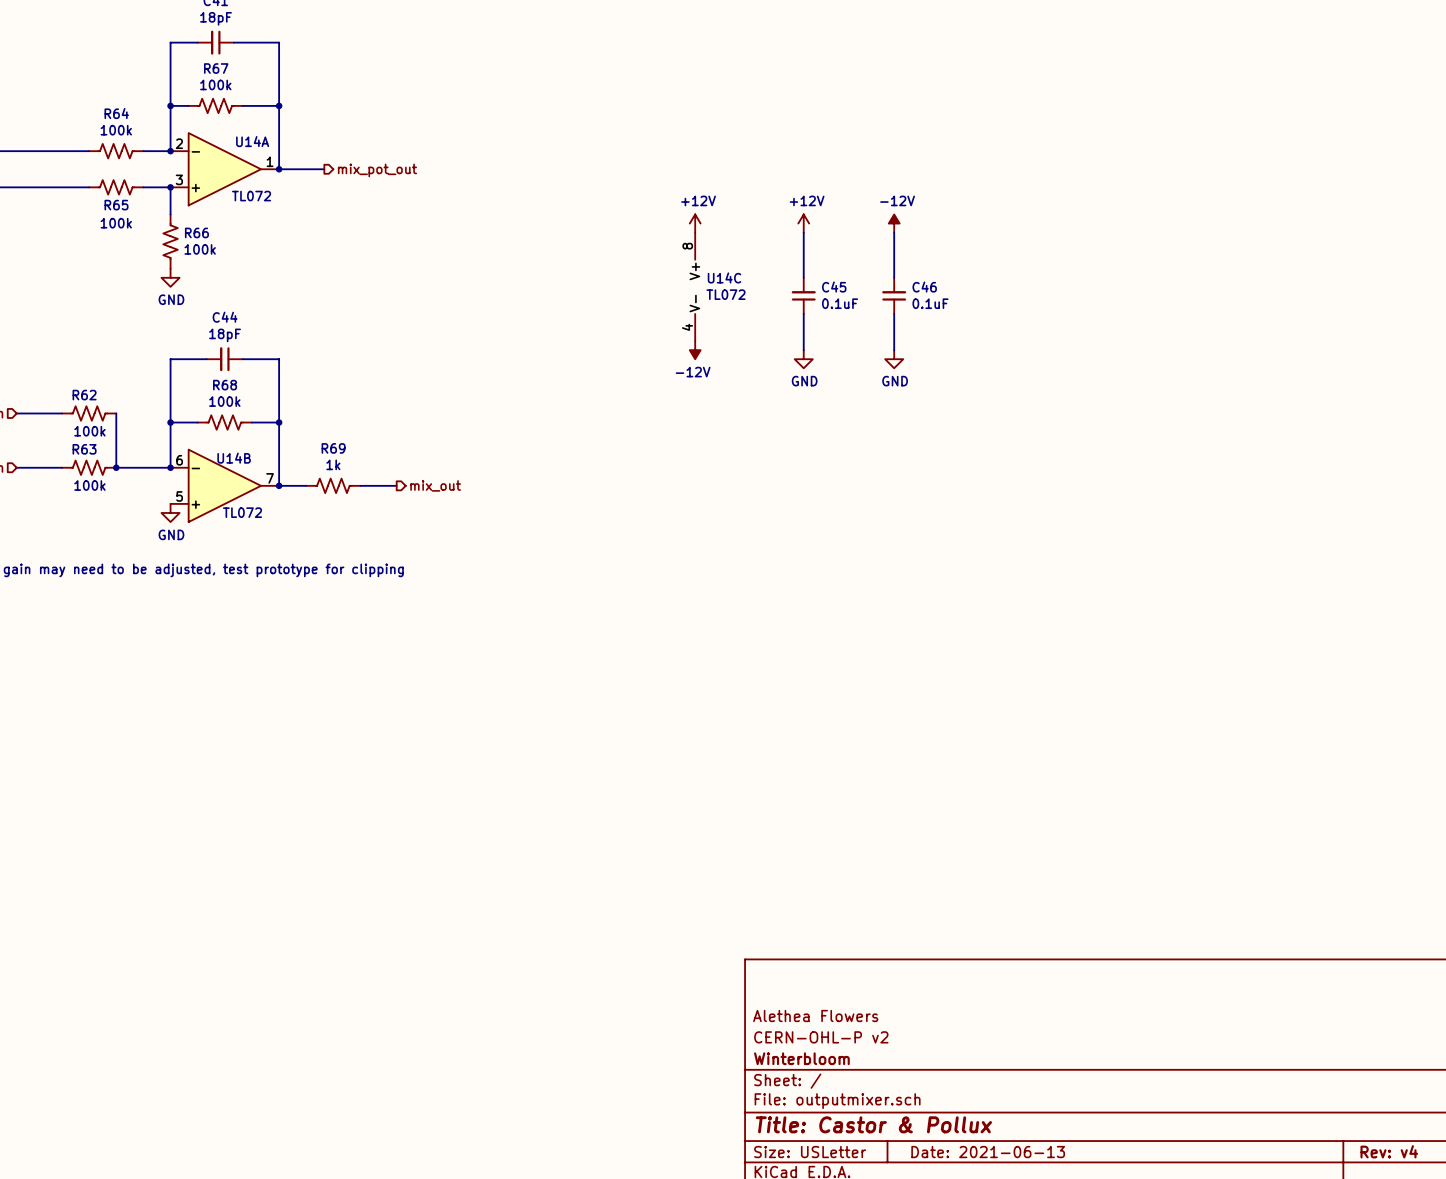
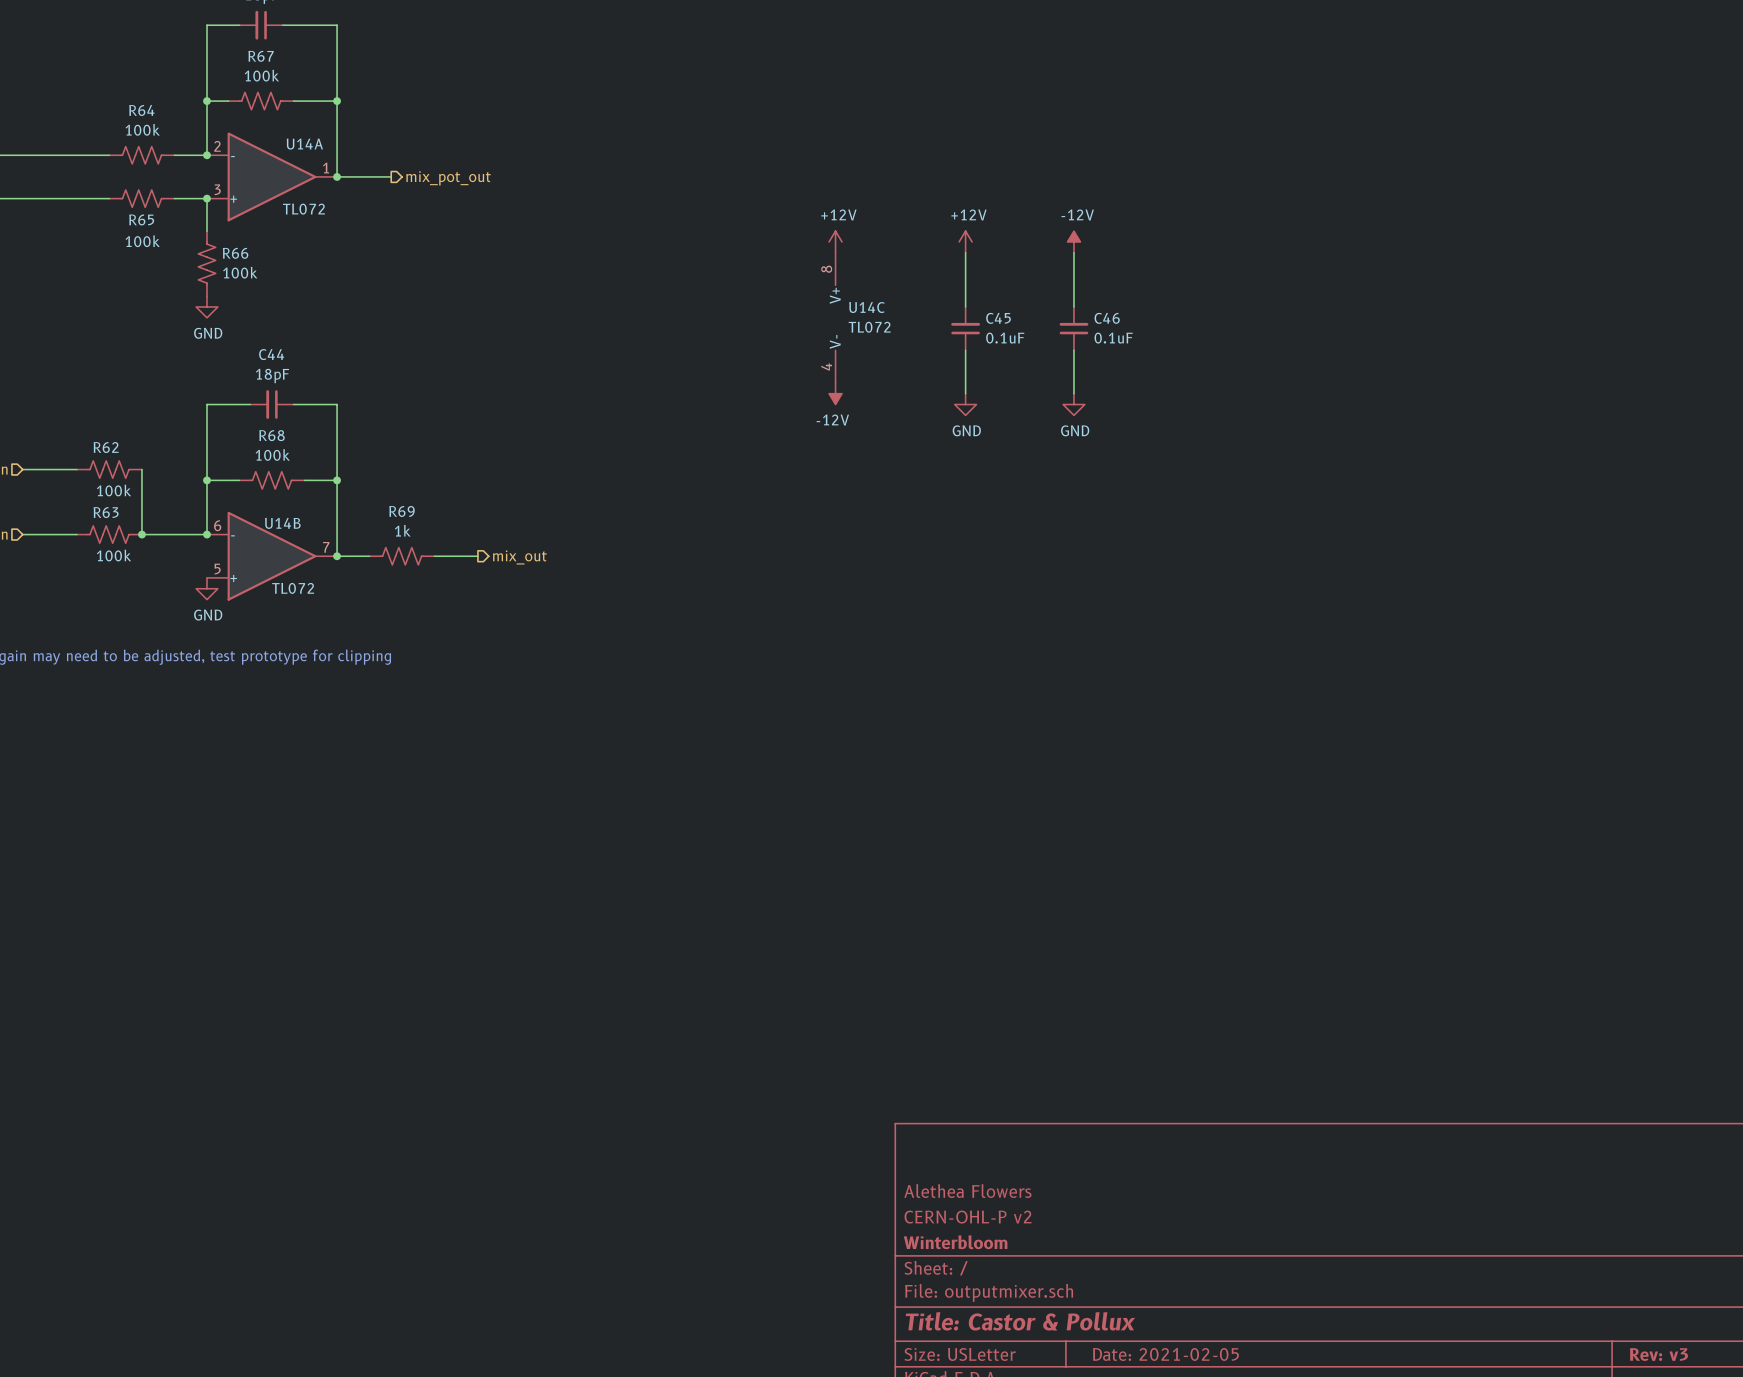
title block: Rev: v4 (1389, 1151) -> Rev: v3 (1658, 1354)
title block: Date: 2021-06-13 (988, 1152) -> Date: 2021-02-05 (1165, 1354)

